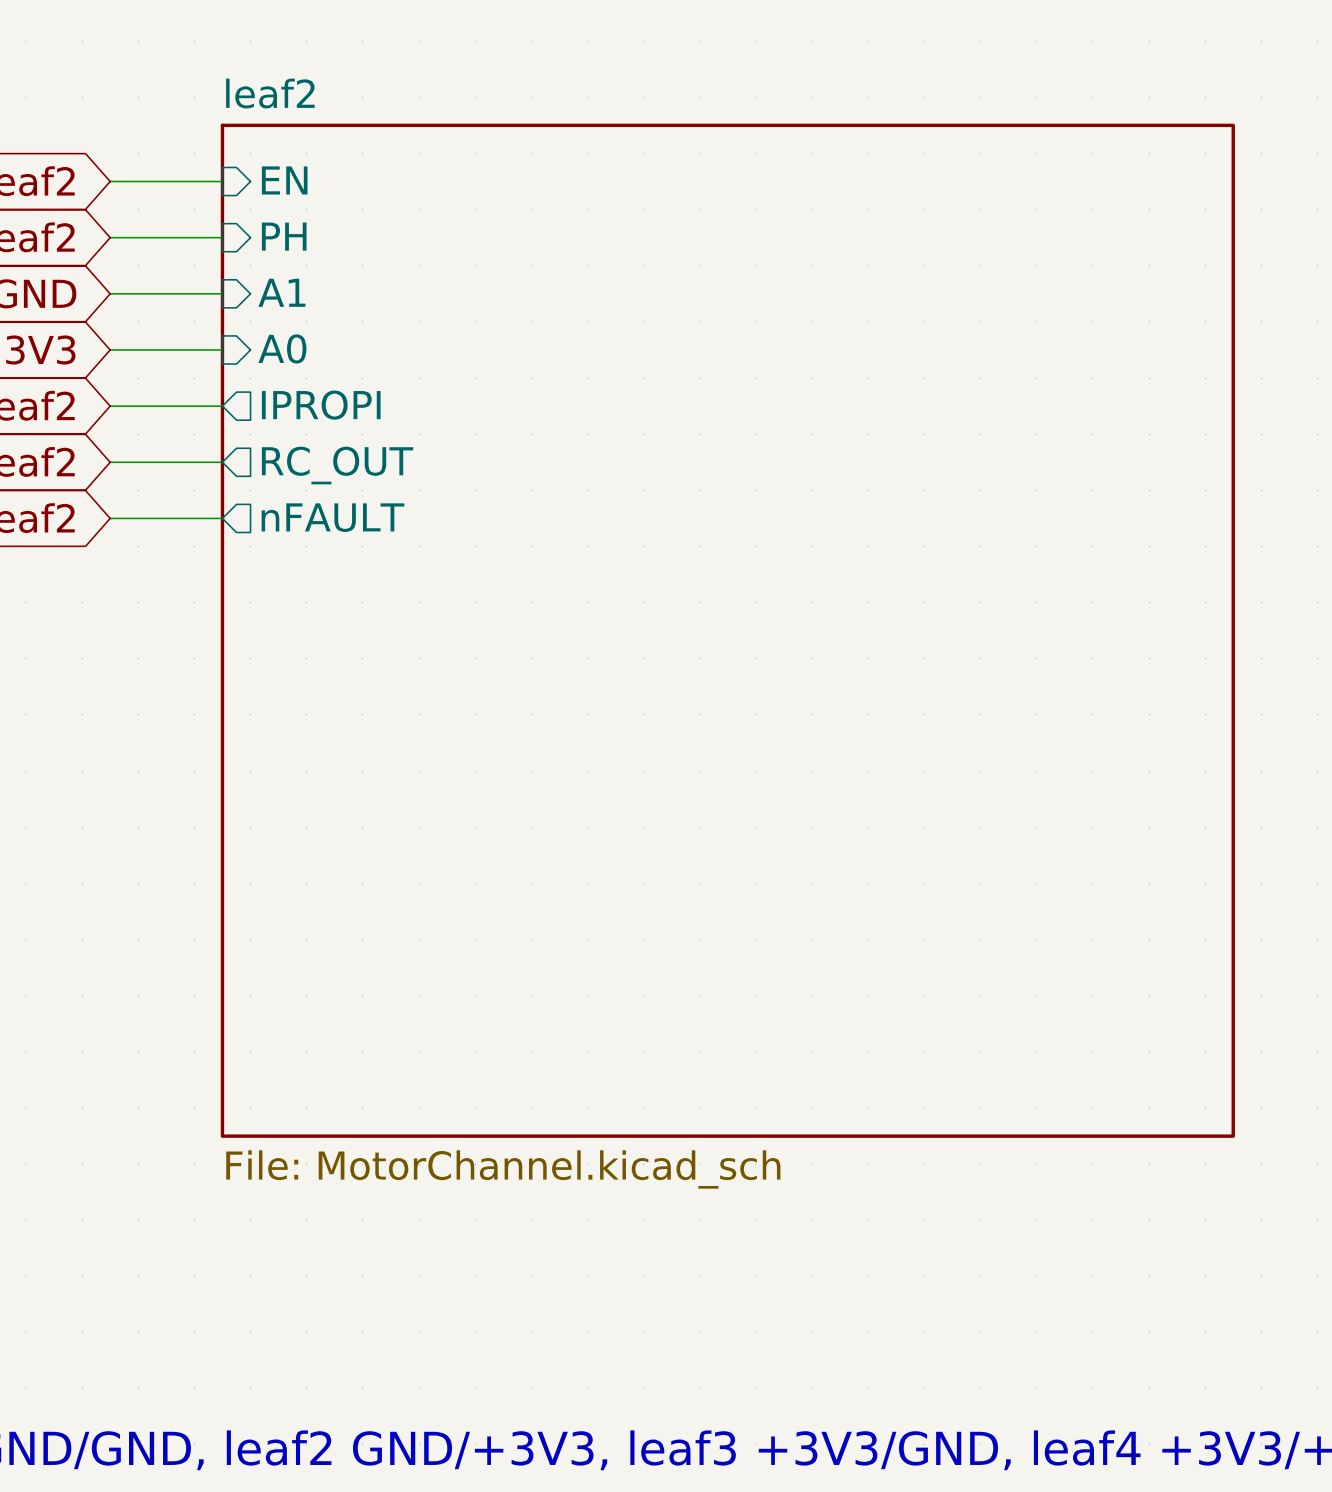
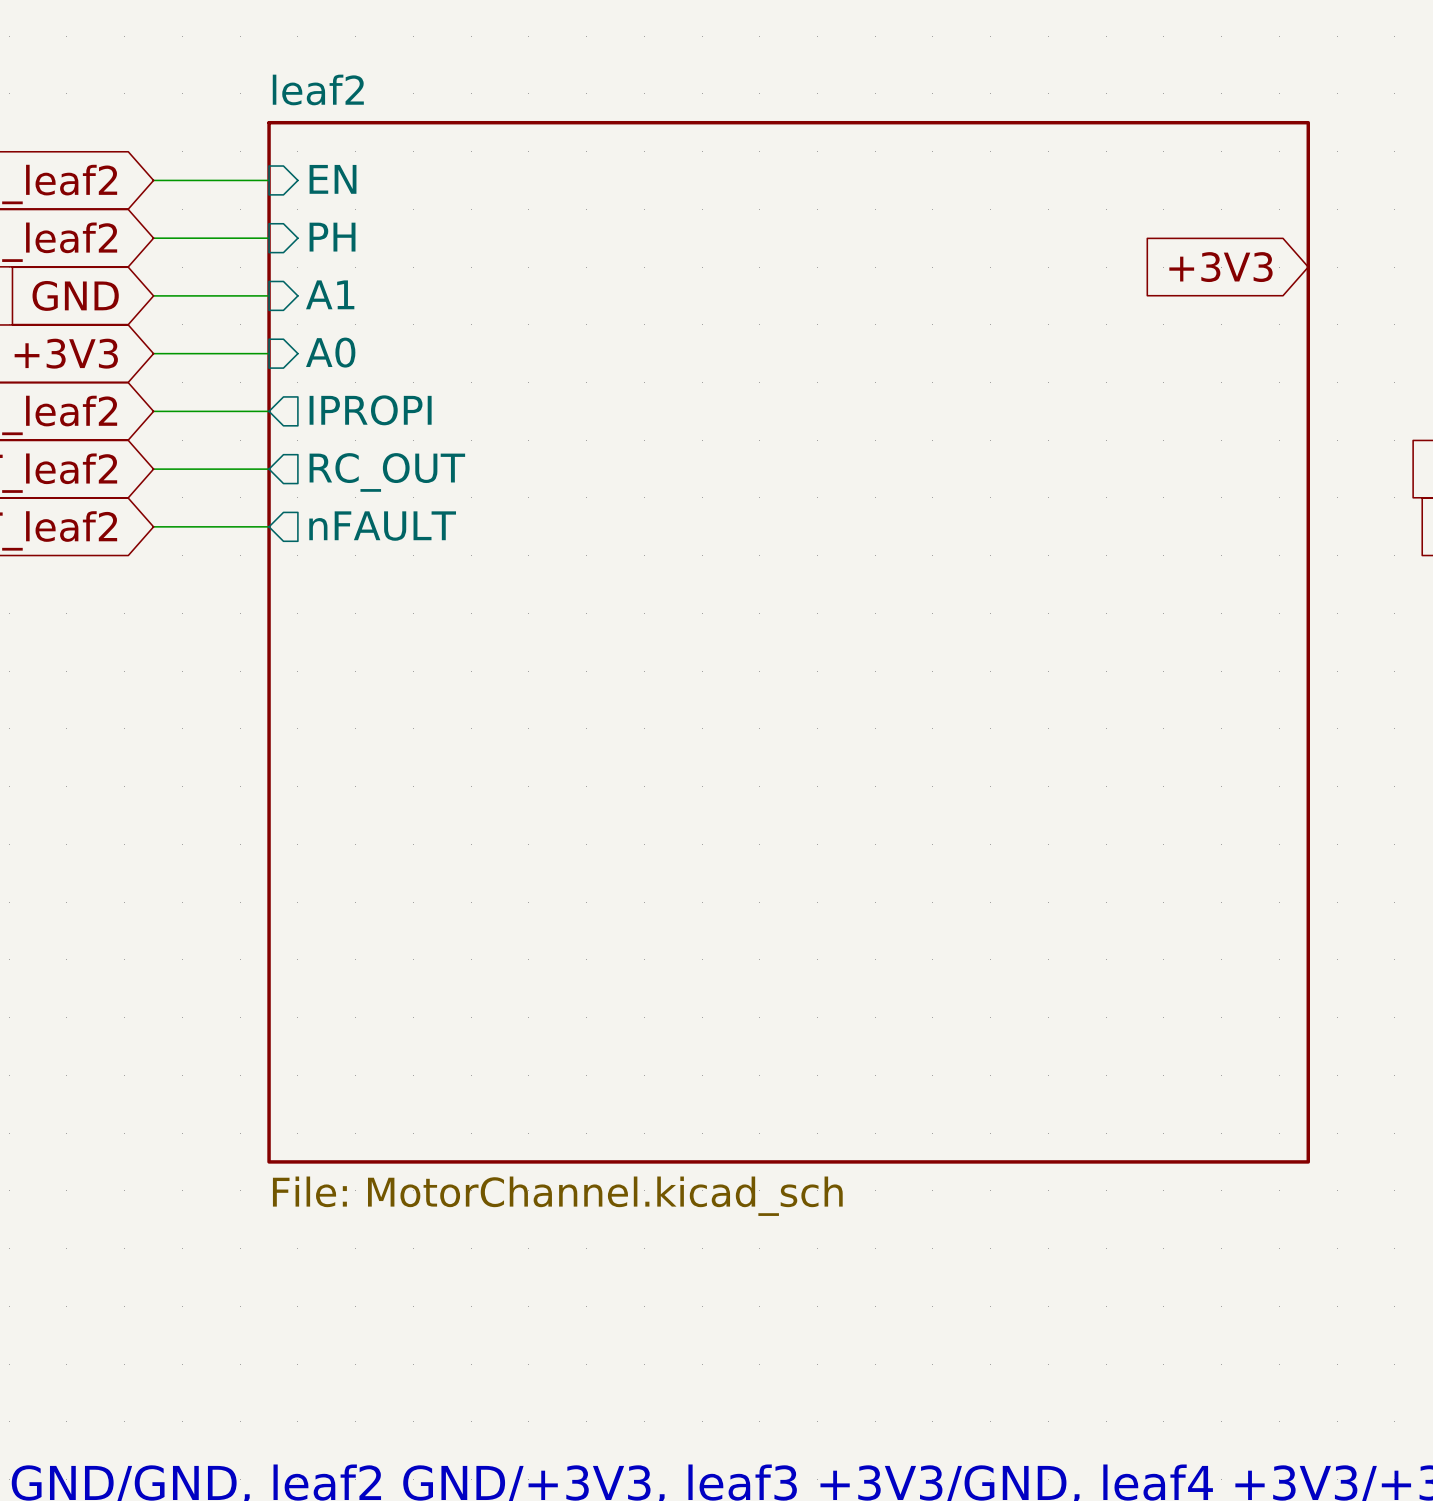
global label: none -> +3V3 (1220, 267)

